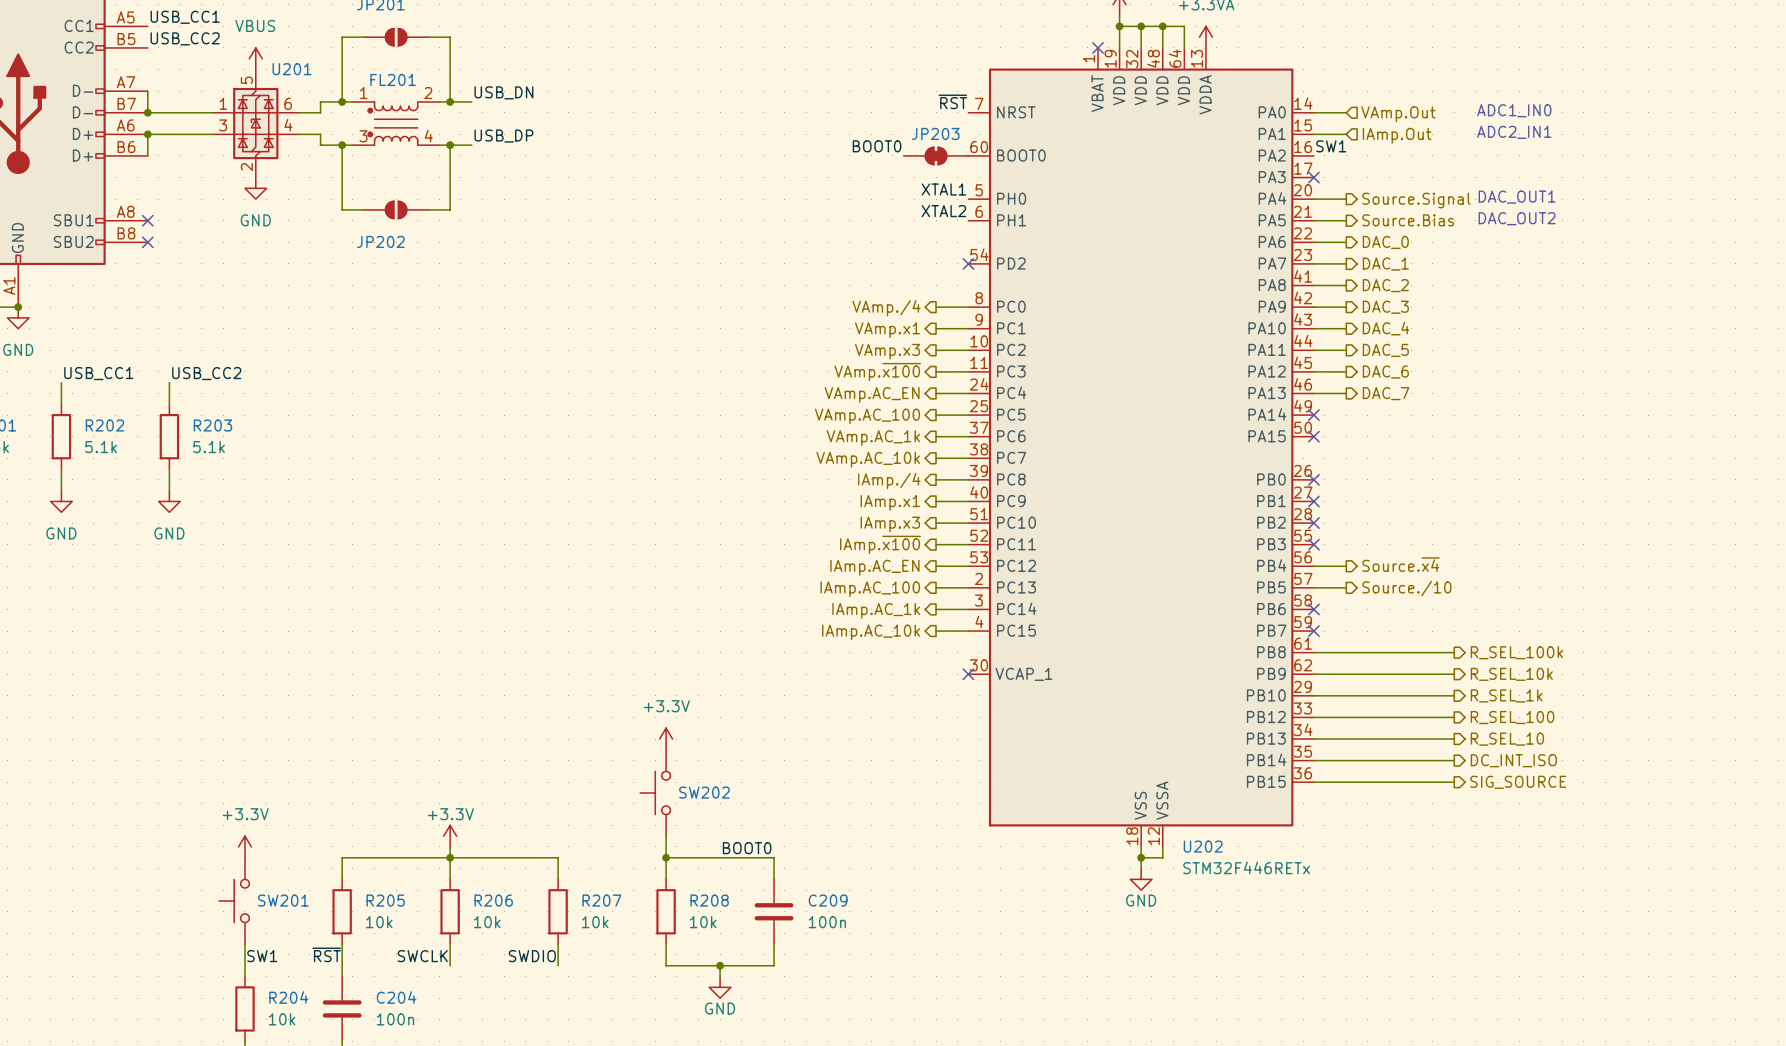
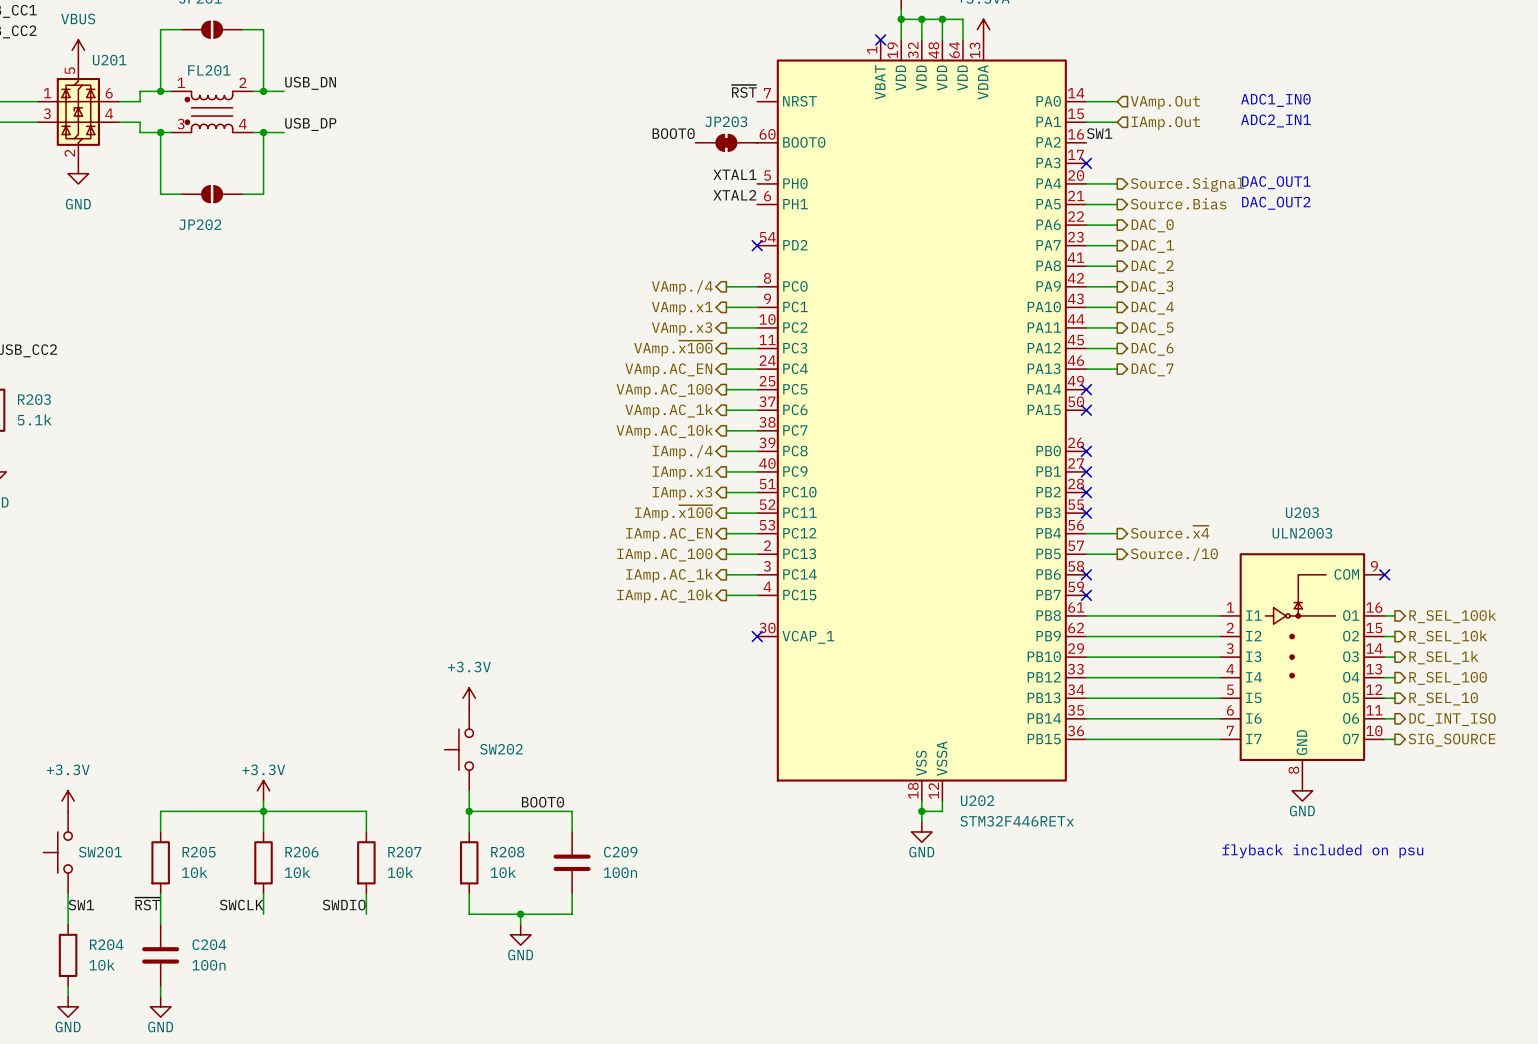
no-connect mark: none -> (1384, 574)
hierarchical label position: R_SEL_100k (1516, 652) -> R_SEL_100k (1452, 616)
wire: none -> (1384, 615) (1394, 615)
hierarchical label position: R_SEL_10k (1511, 674) -> R_SEL_10k (1448, 637)
wire: none -> (1384, 636) (1394, 636)
hierarchical label position: R_SEL_1k (1506, 695) -> R_SEL_1k (1443, 657)
wire: none -> (1384, 657) (1394, 657)
U203: none -> ULN2003 (1302, 666)
hierarchical label position: R_SEL_100 (1512, 717) -> R_SEL_100 (1448, 678)
wire: none -> (1384, 677) (1394, 677)
hierarchical label position: R_SEL_10 (1507, 739) -> R_SEL_10 (1443, 699)
wire: none -> (1384, 698) (1394, 698)
hierarchical label position: DC_INT_ISO (1513, 760) -> DC_INT_ISO (1452, 719)
wire: none -> (1384, 718) (1394, 718)
hierarchical label position: SIG_SOURCE (1518, 782) -> SIG_SOURCE (1451, 740)
wire: none -> (1384, 739) (1394, 739)
power symbol: none -> GND (1302, 790)
text: none -> flyback included on psu (1322, 851)

